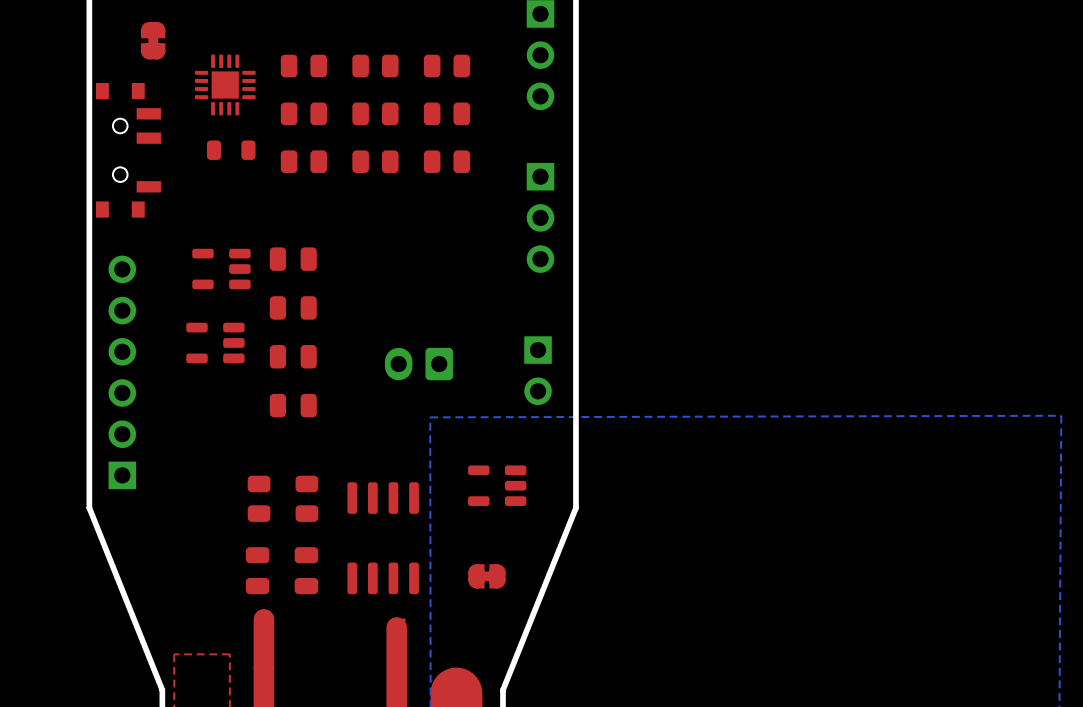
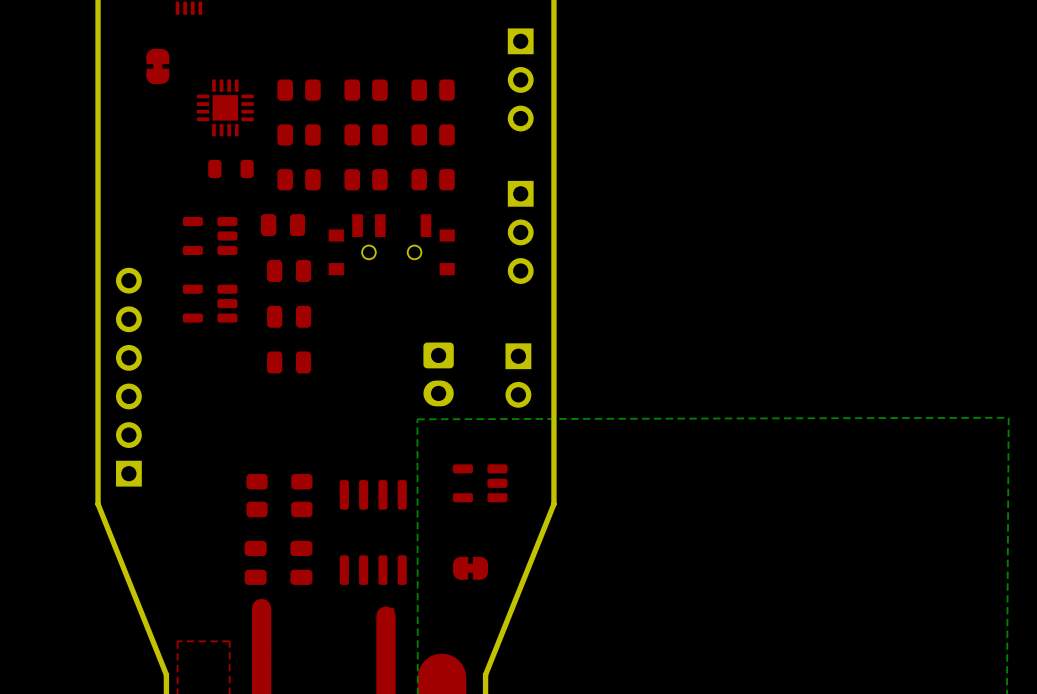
part rotation: 0° (128, 150) -> 90° counterclockwise (391, 244)
part position: (128, 150) -> (391, 244)
part: none -> (210, 235)
part: (221, 269) -> none
part: none -> (210, 303)
part: (215, 342) -> none
part rotation: 0° (418, 364) -> 90° counterclockwise (438, 374)
part position: (293, 405) -> (283, 225)

